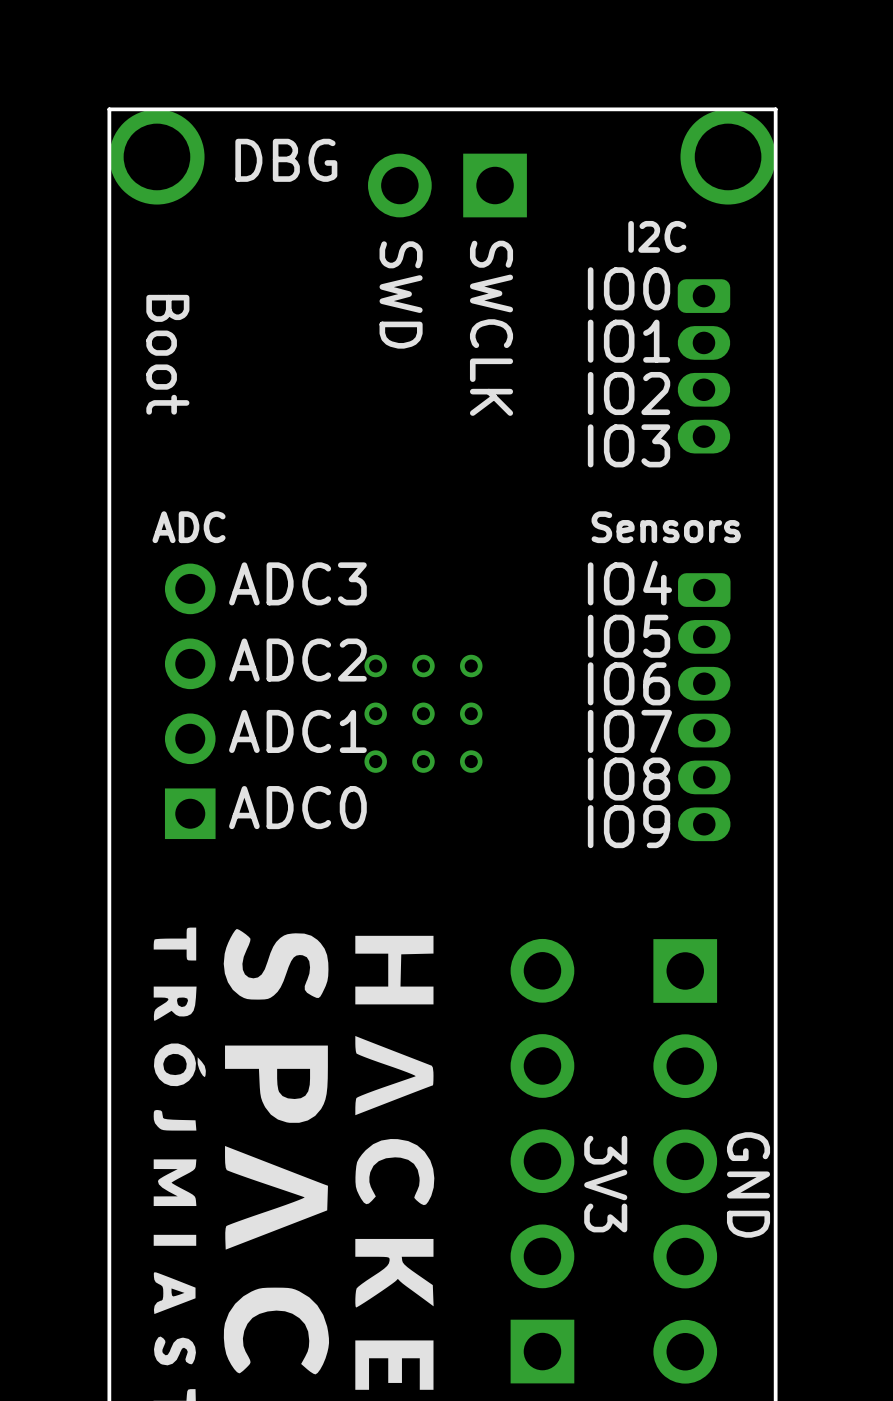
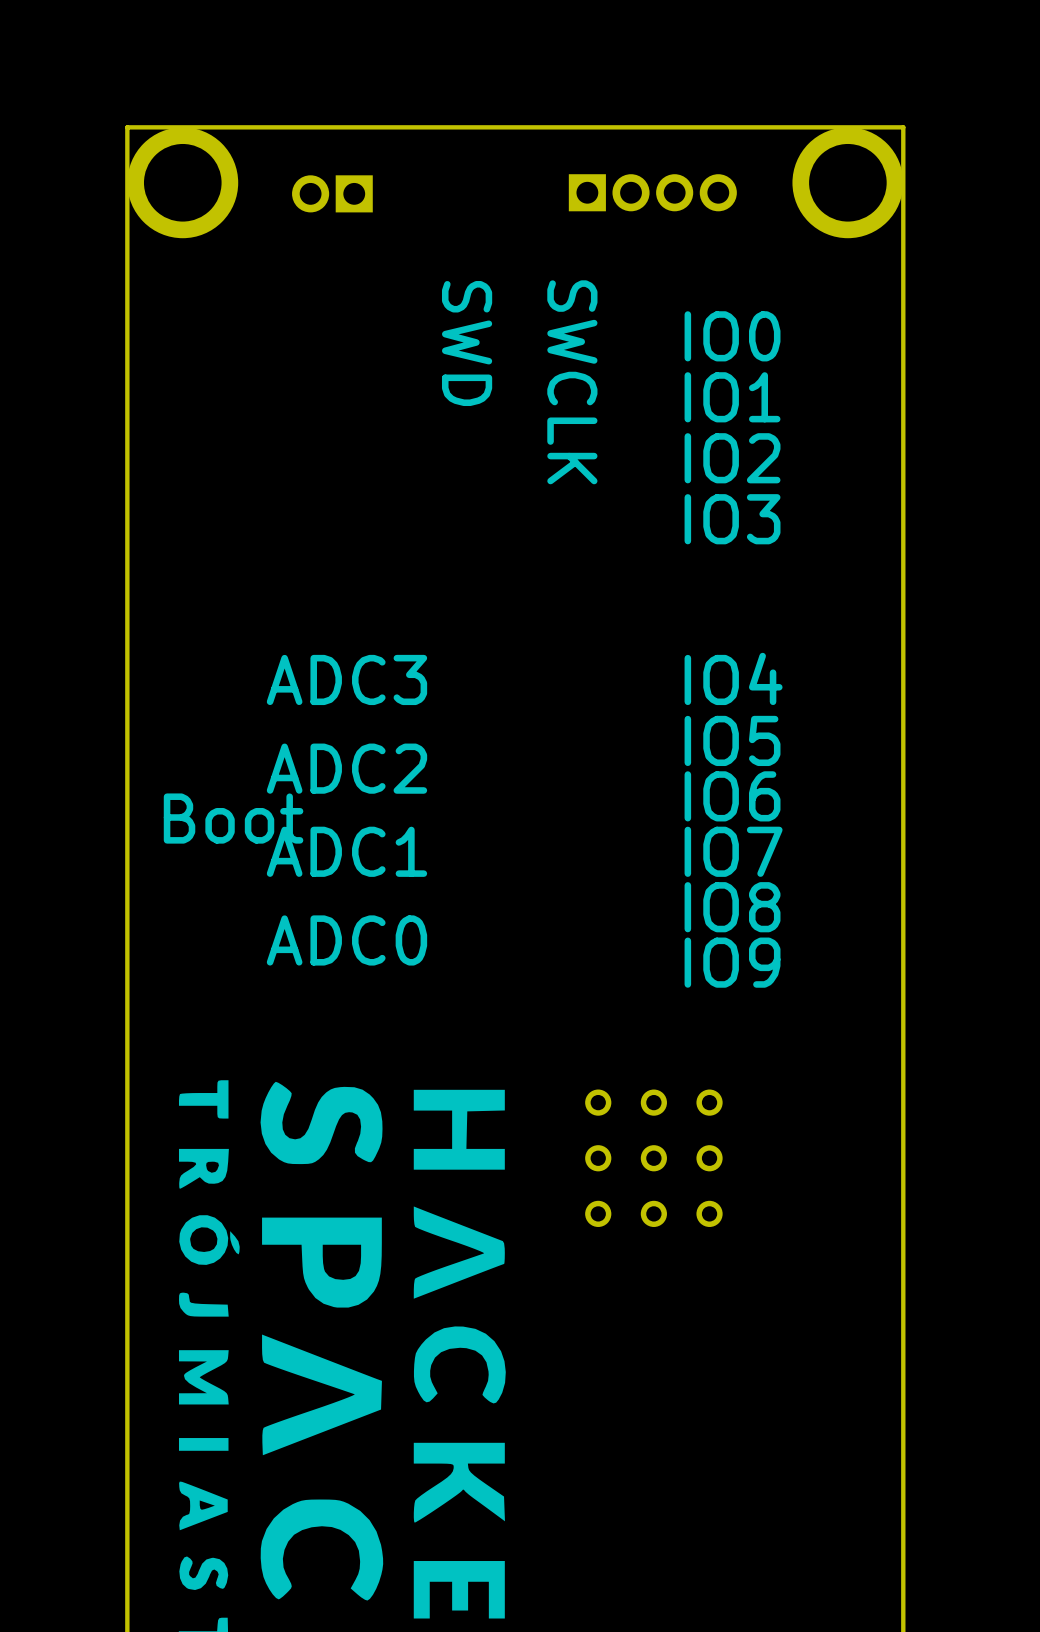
part: none -> (652, 192)
part: none -> (332, 193)
part: DBG (447, 185) -> none
part position: (167, 354) -> (233, 818)
part value rotation: 0° (167, 354) -> 90° counterclockwise (233, 818)
part: I2C (703, 366) -> none
ADC: (190, 701) -> none
part: Sensors (704, 707) -> none
part position: (423, 713) -> (653, 1158)
part: 3V3 (542, 1161) -> none
part: GND (685, 1161) -> none

